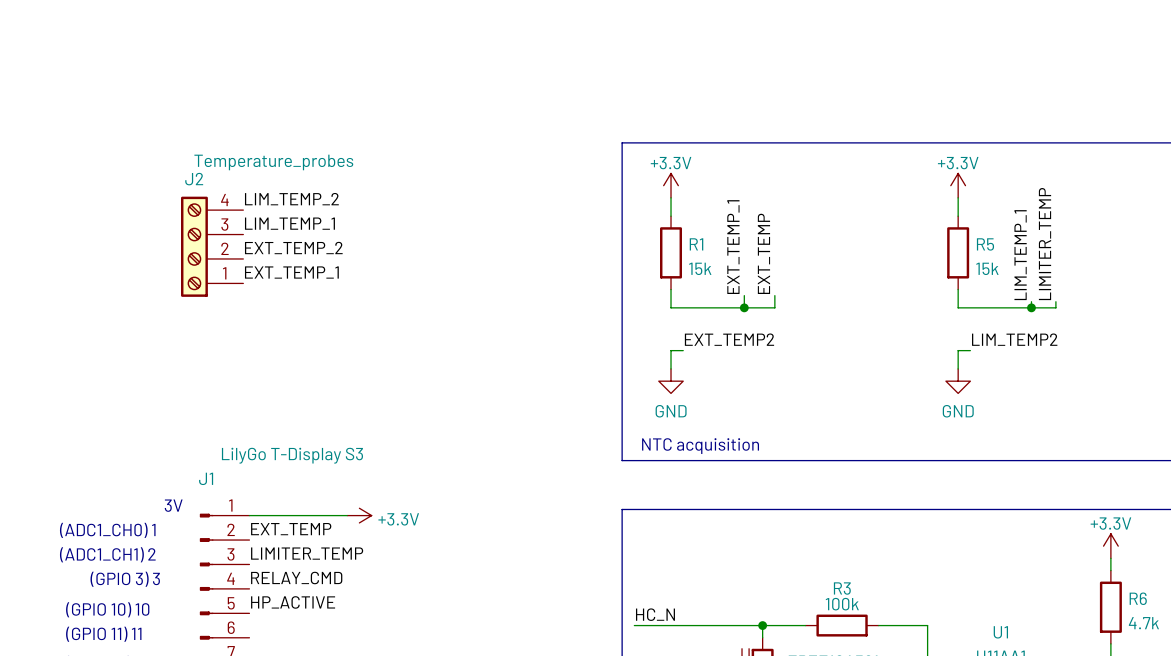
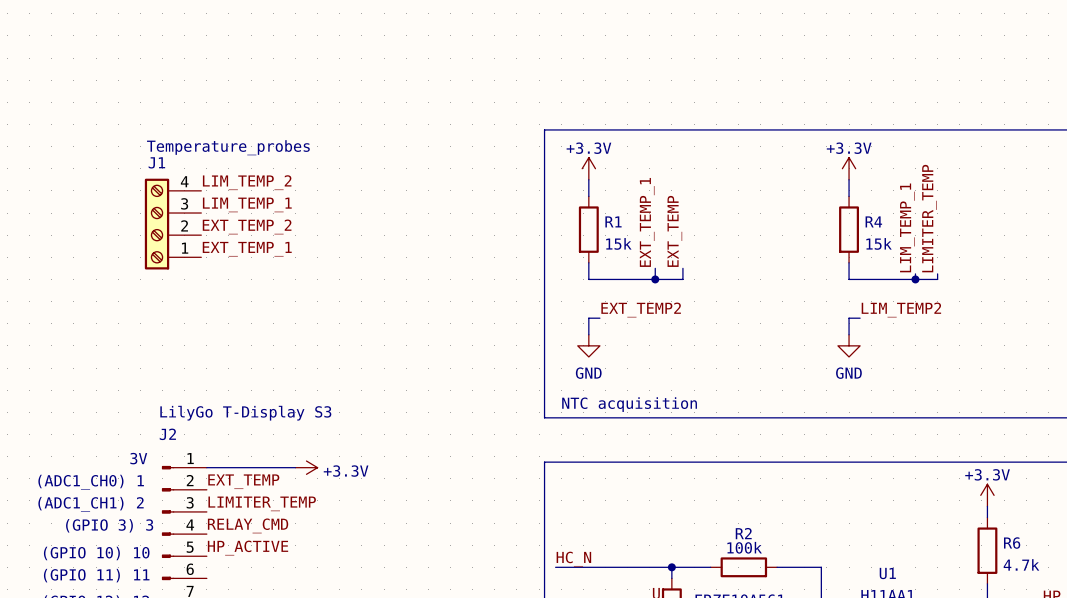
J2 name: J2 (194, 179) -> J1 (156, 162)
R5 name: R5 (985, 244) -> R4 (873, 221)
J1 name: J1 (206, 478) -> J2 (167, 434)
R3 name: R3 (842, 588) -> R2 (743, 533)

